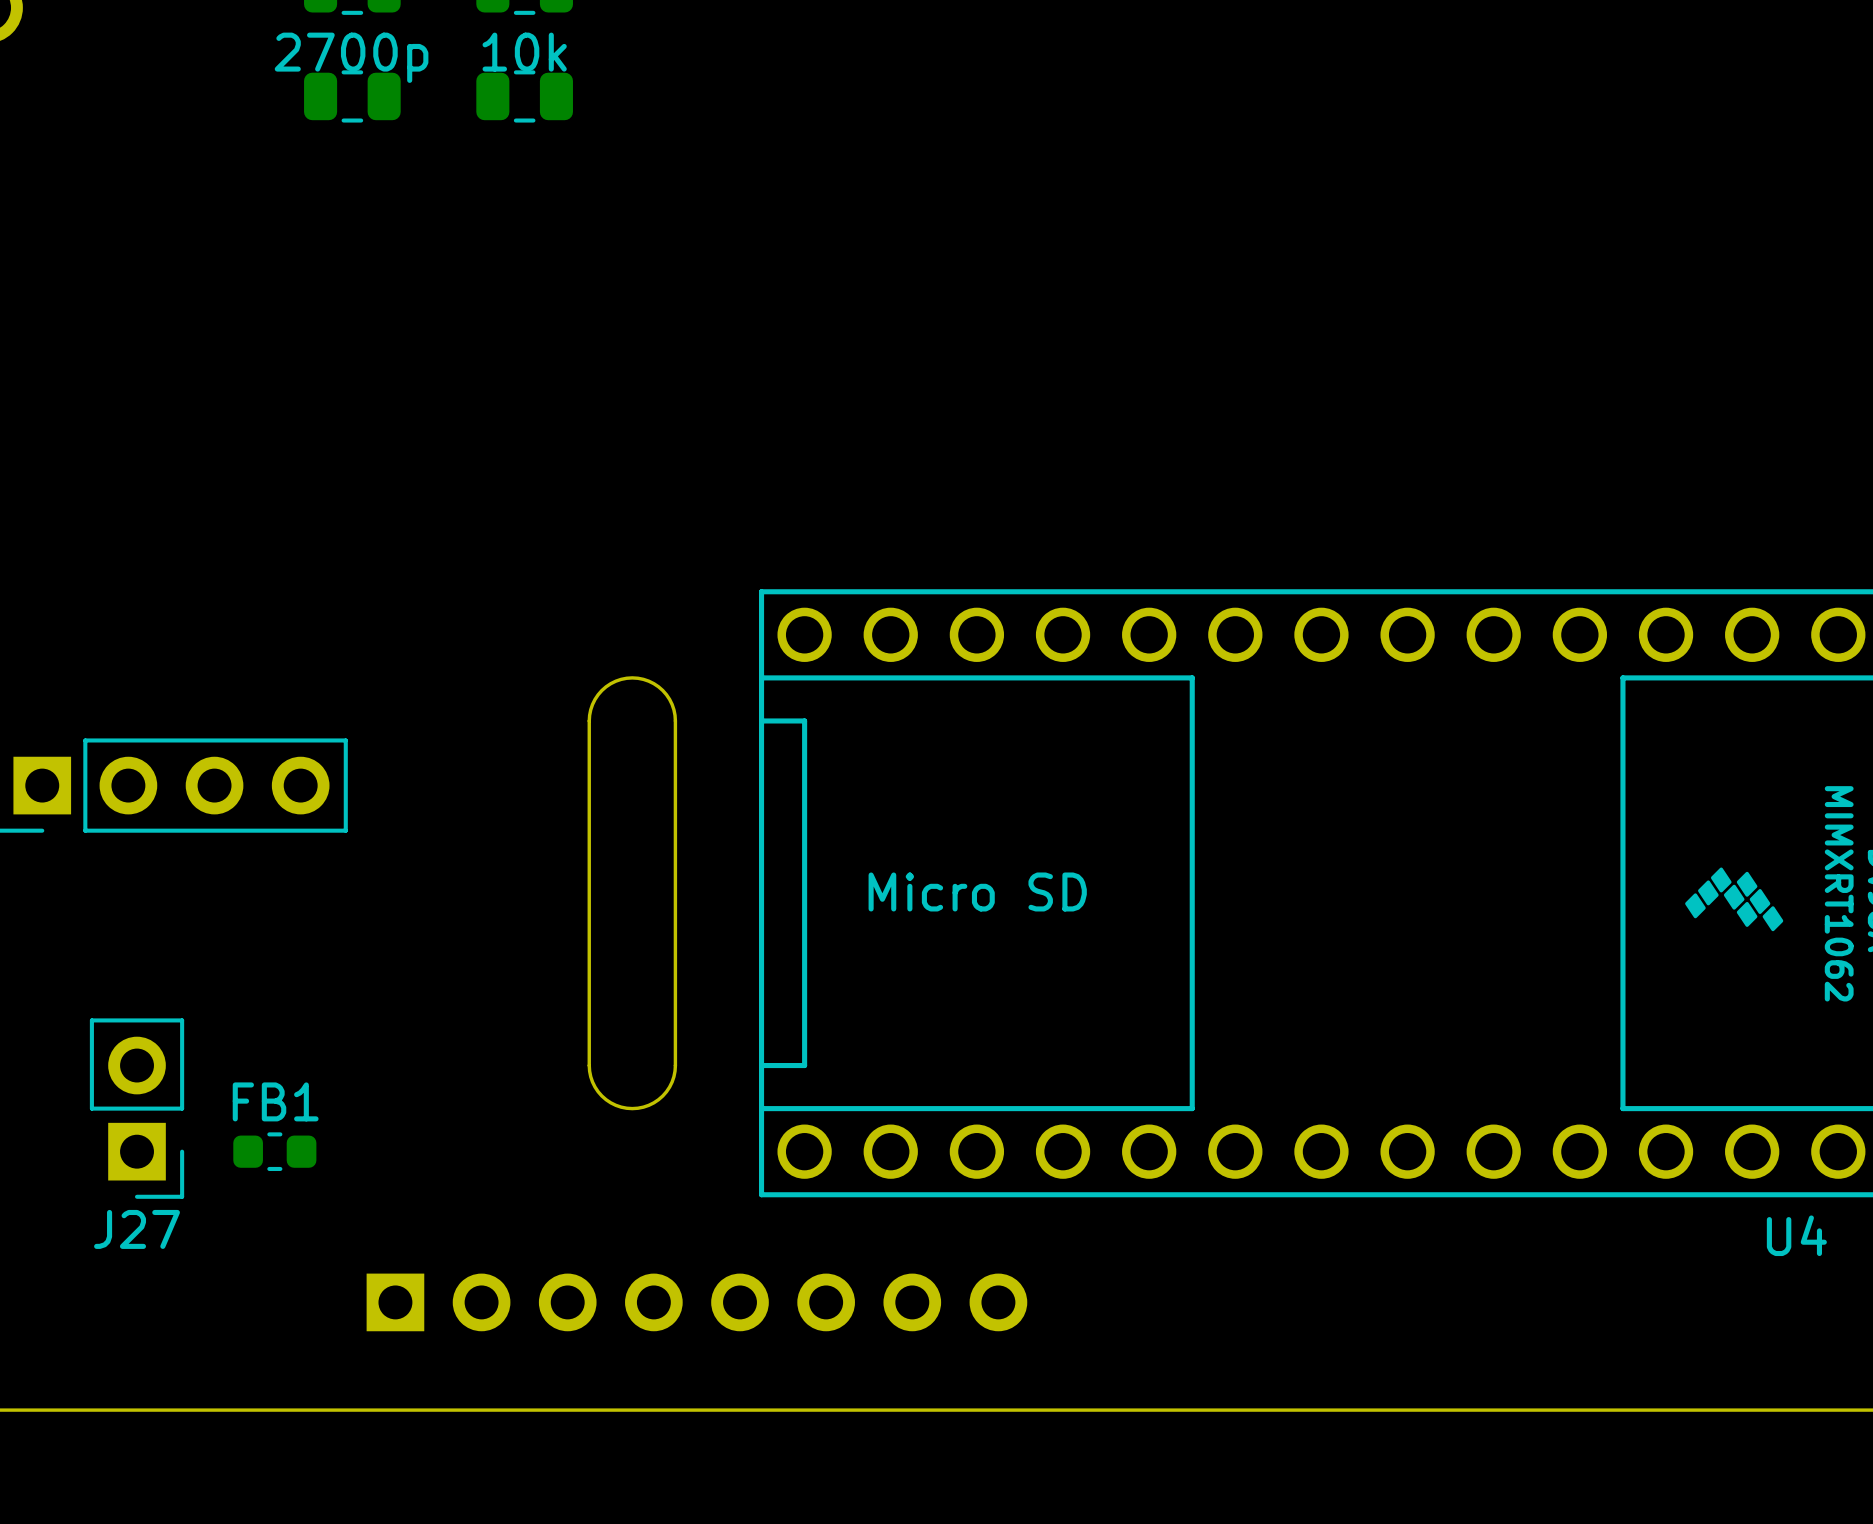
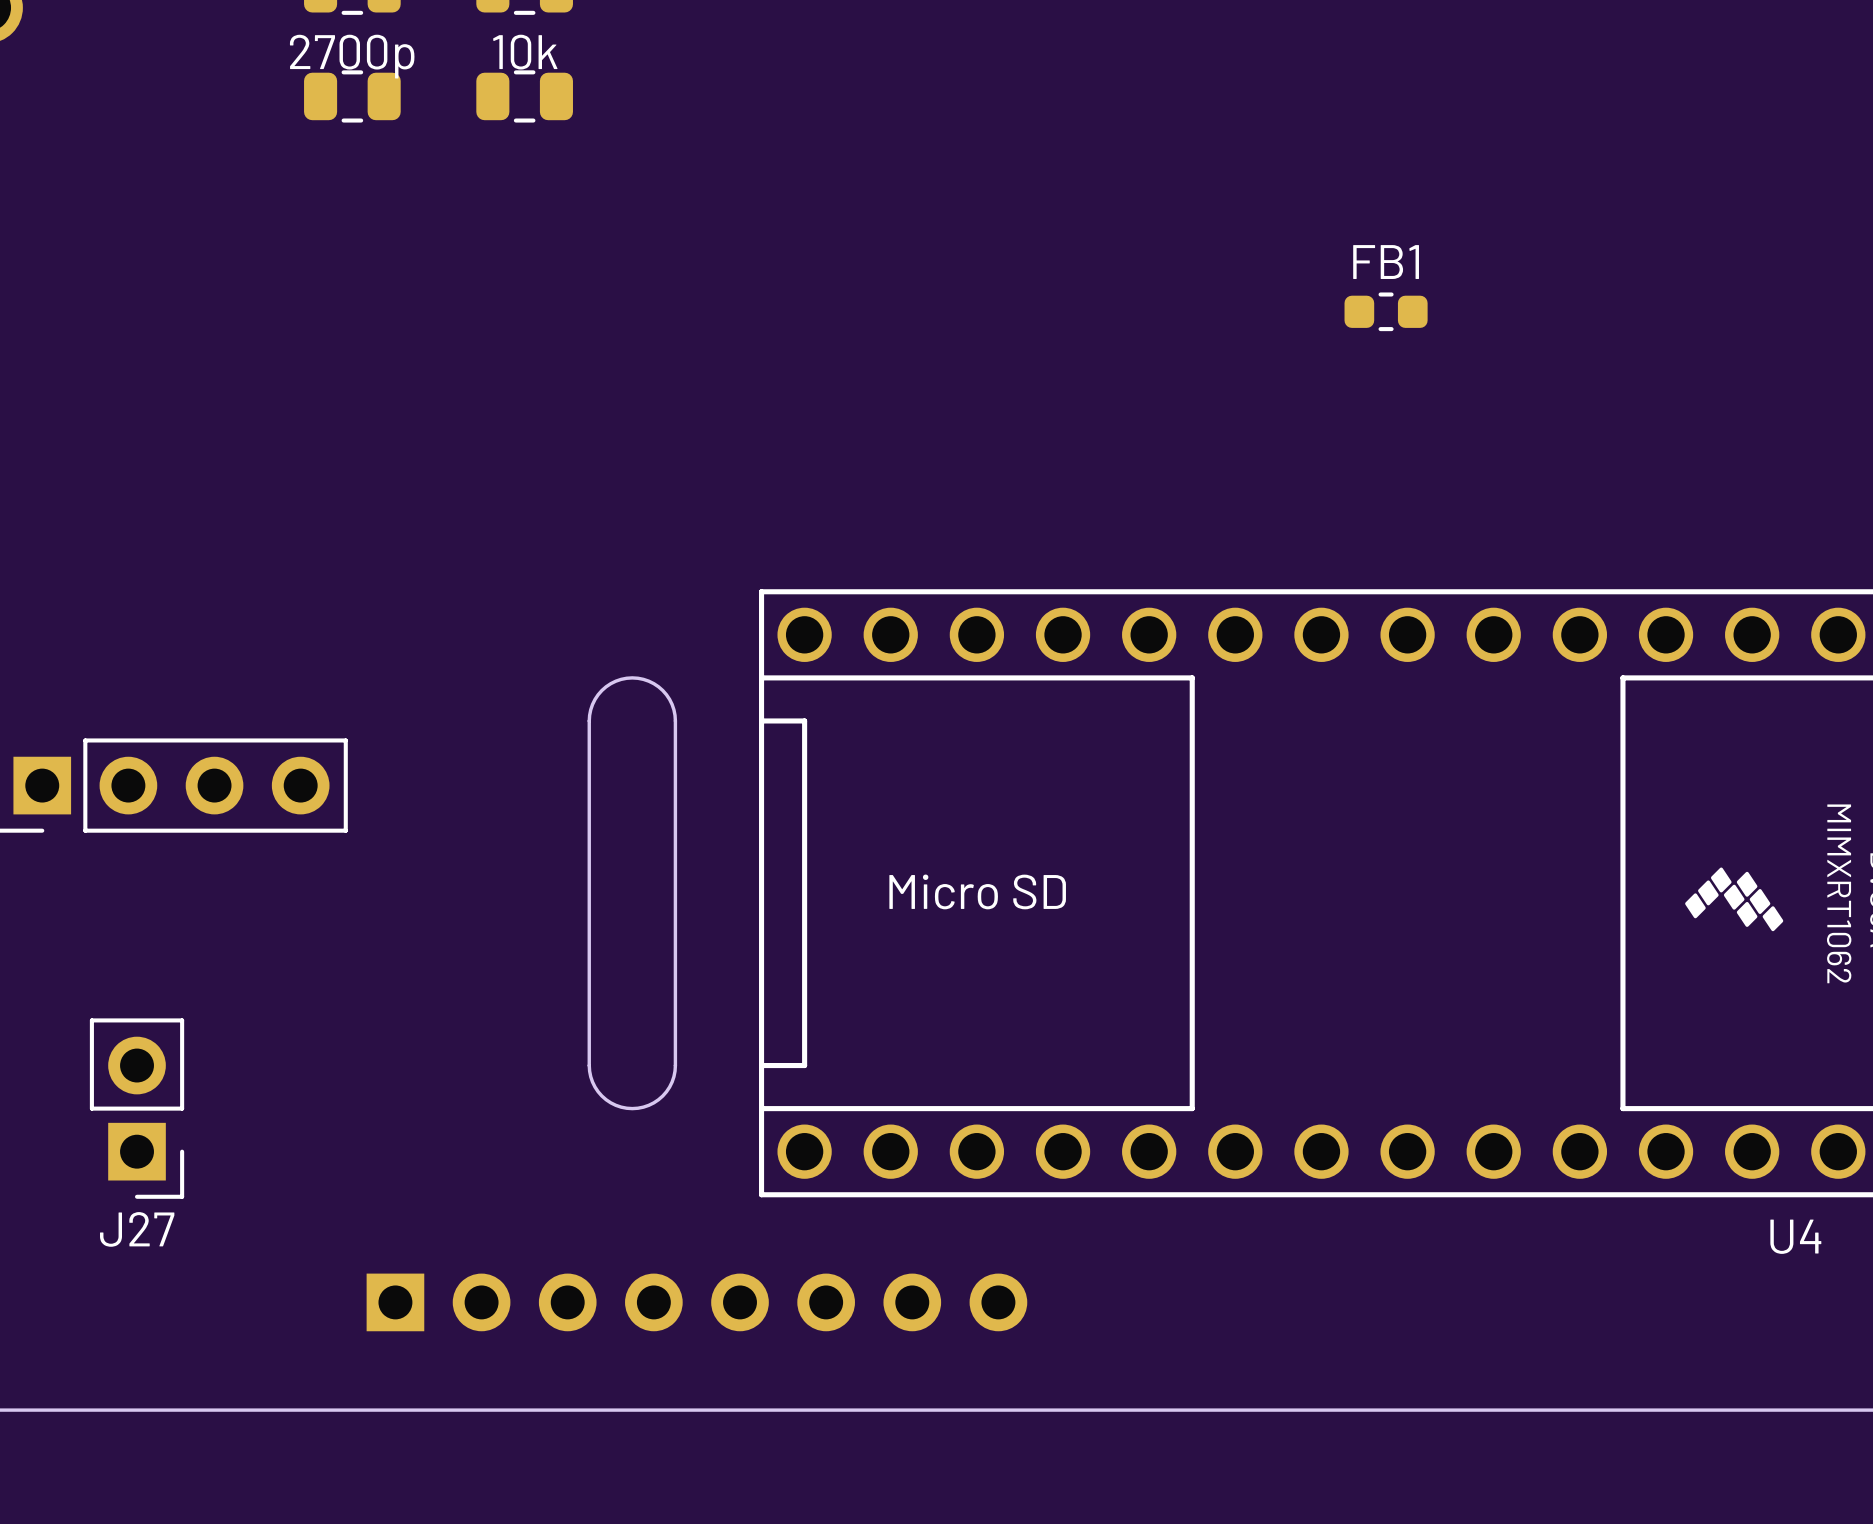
FB1 position: (274, 1151) -> (1386, 311)

